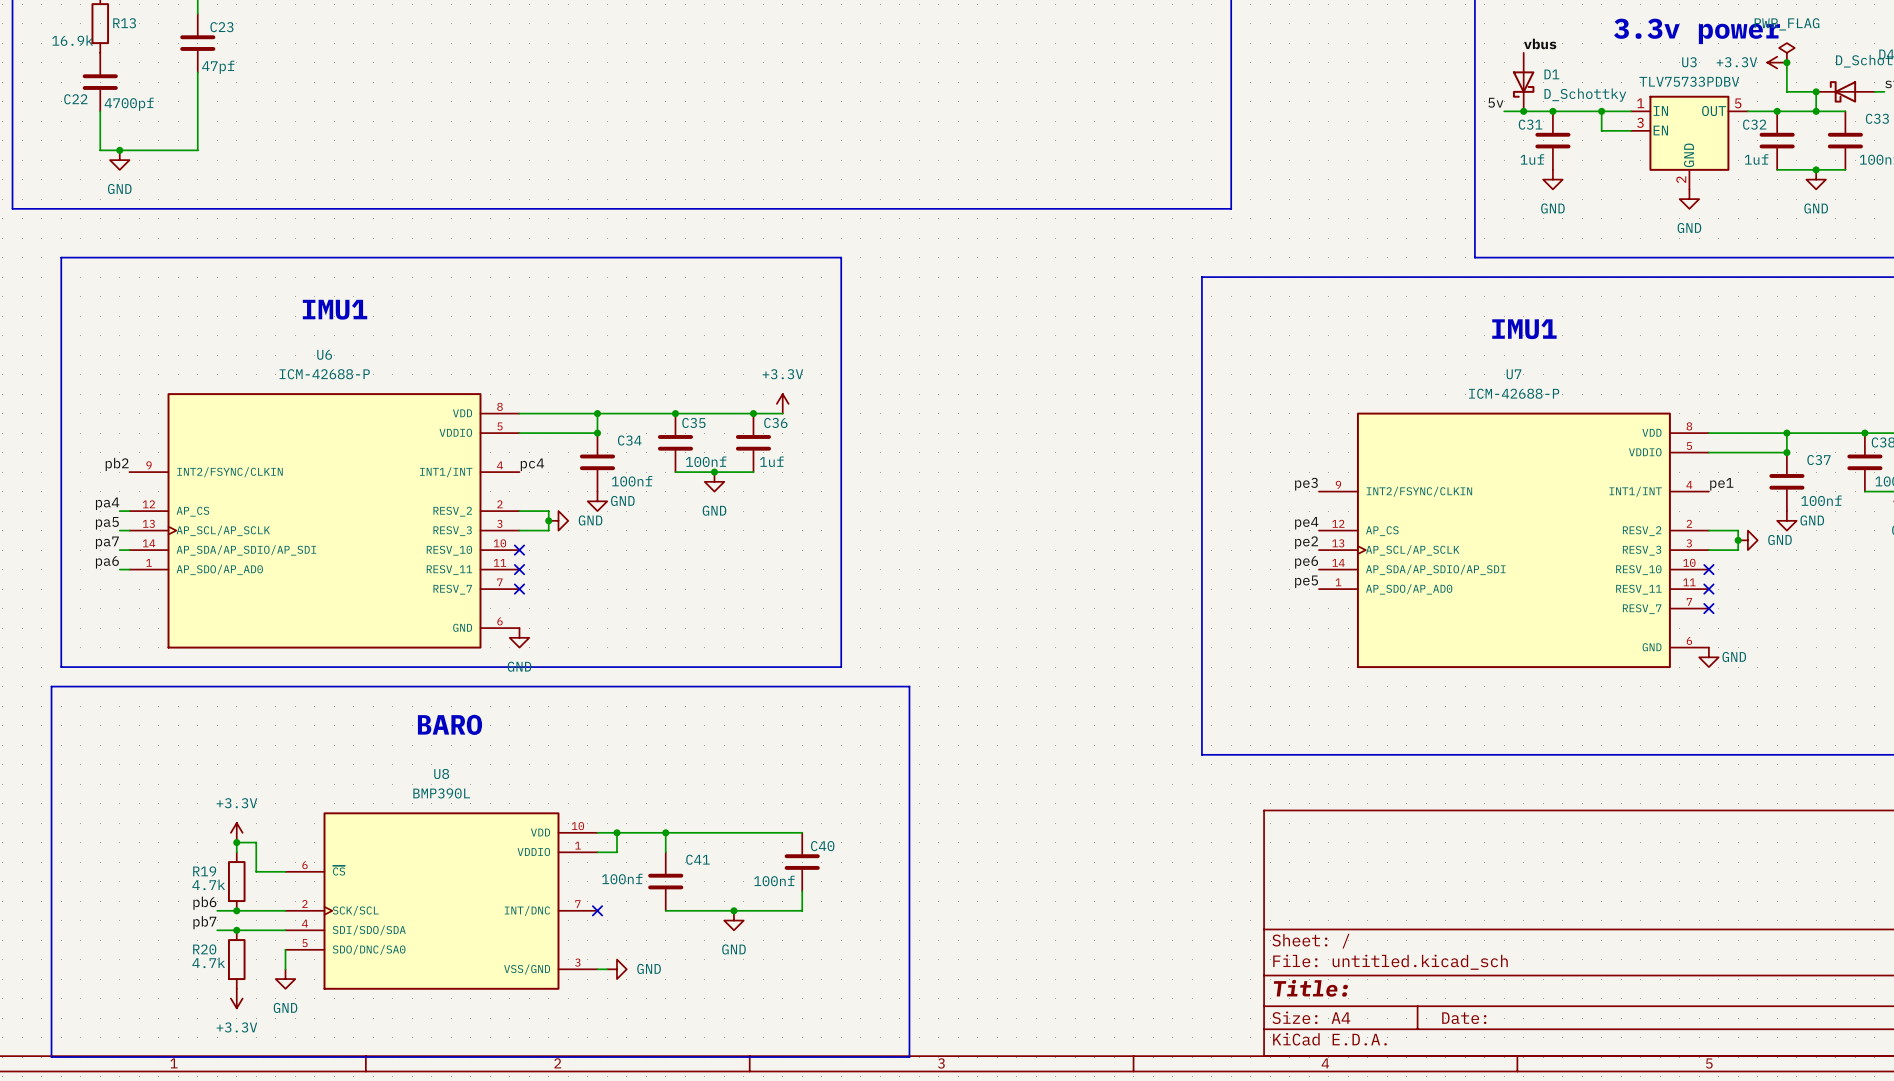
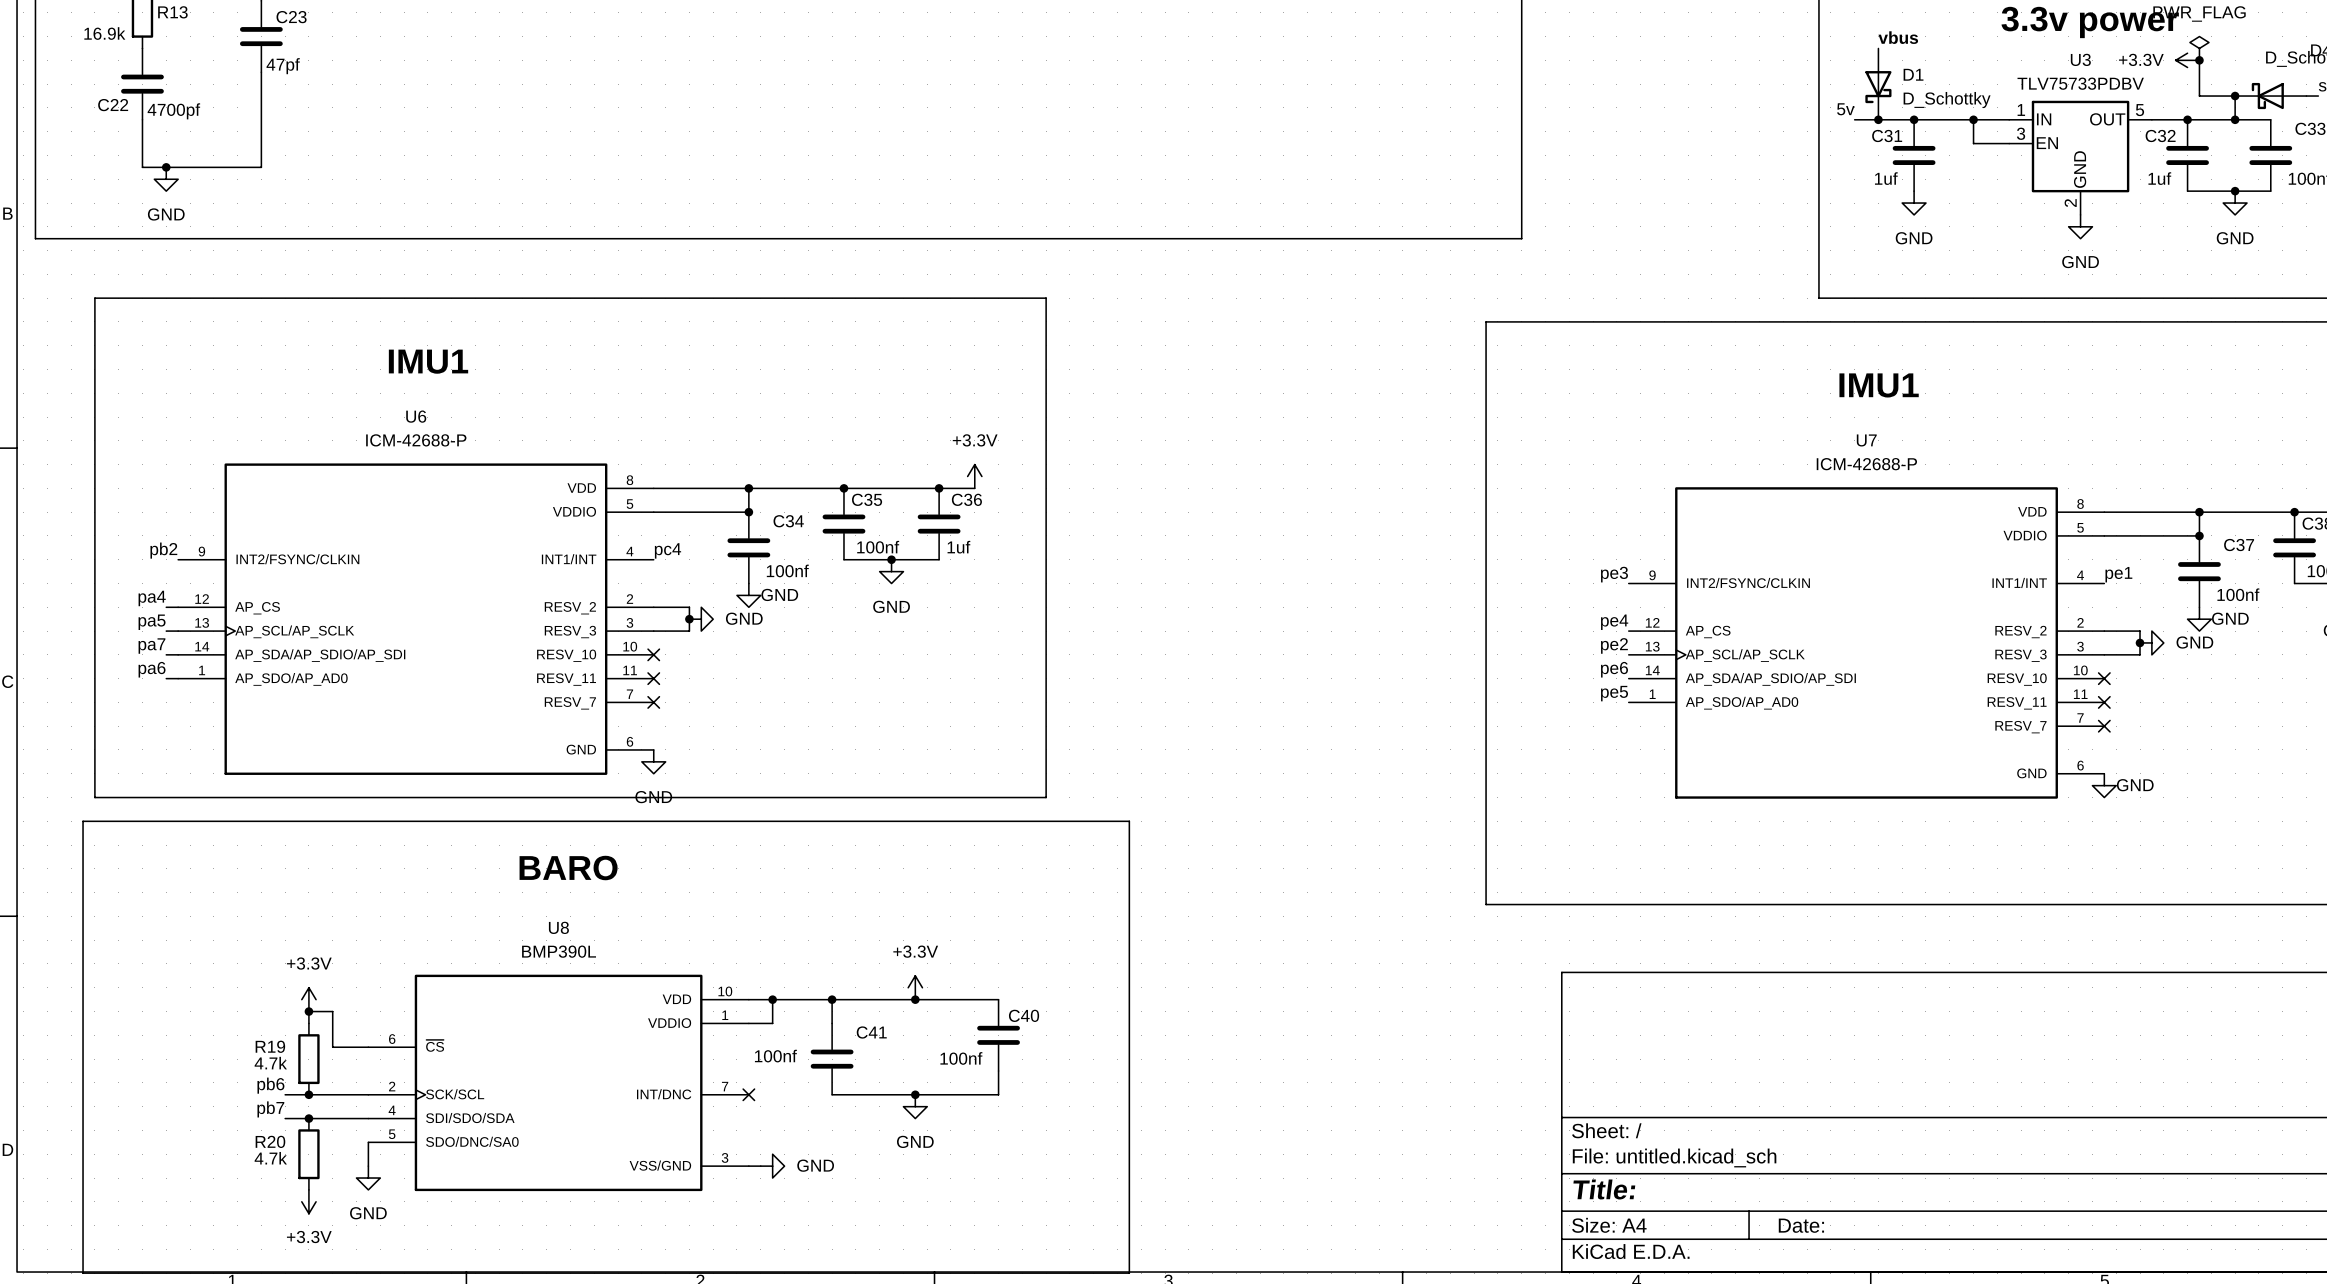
power symbol: none -> +3.3V (915, 987)
junction: none -> (915, 999)

